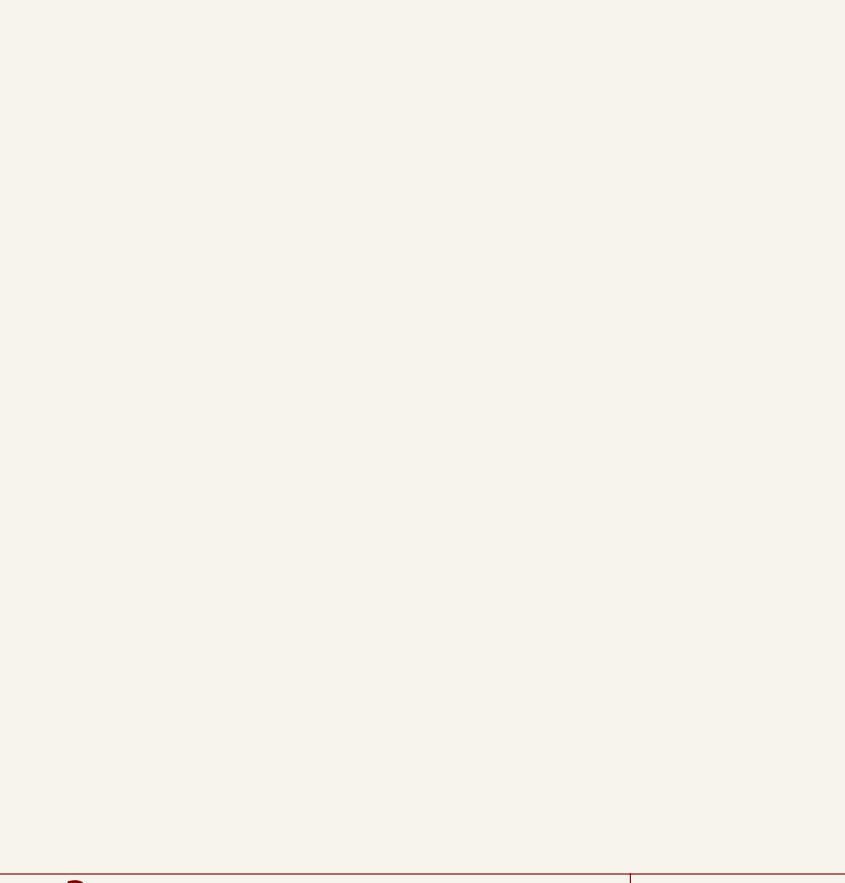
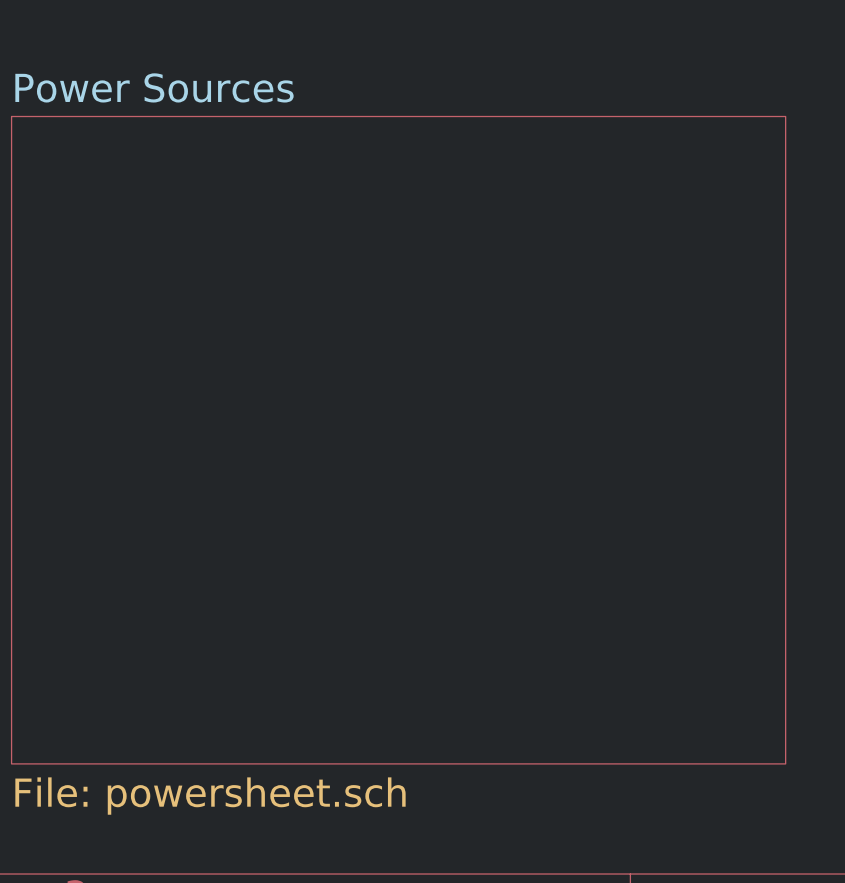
sheet Power Sources: none -> File: powersheet.sch (398, 440)

